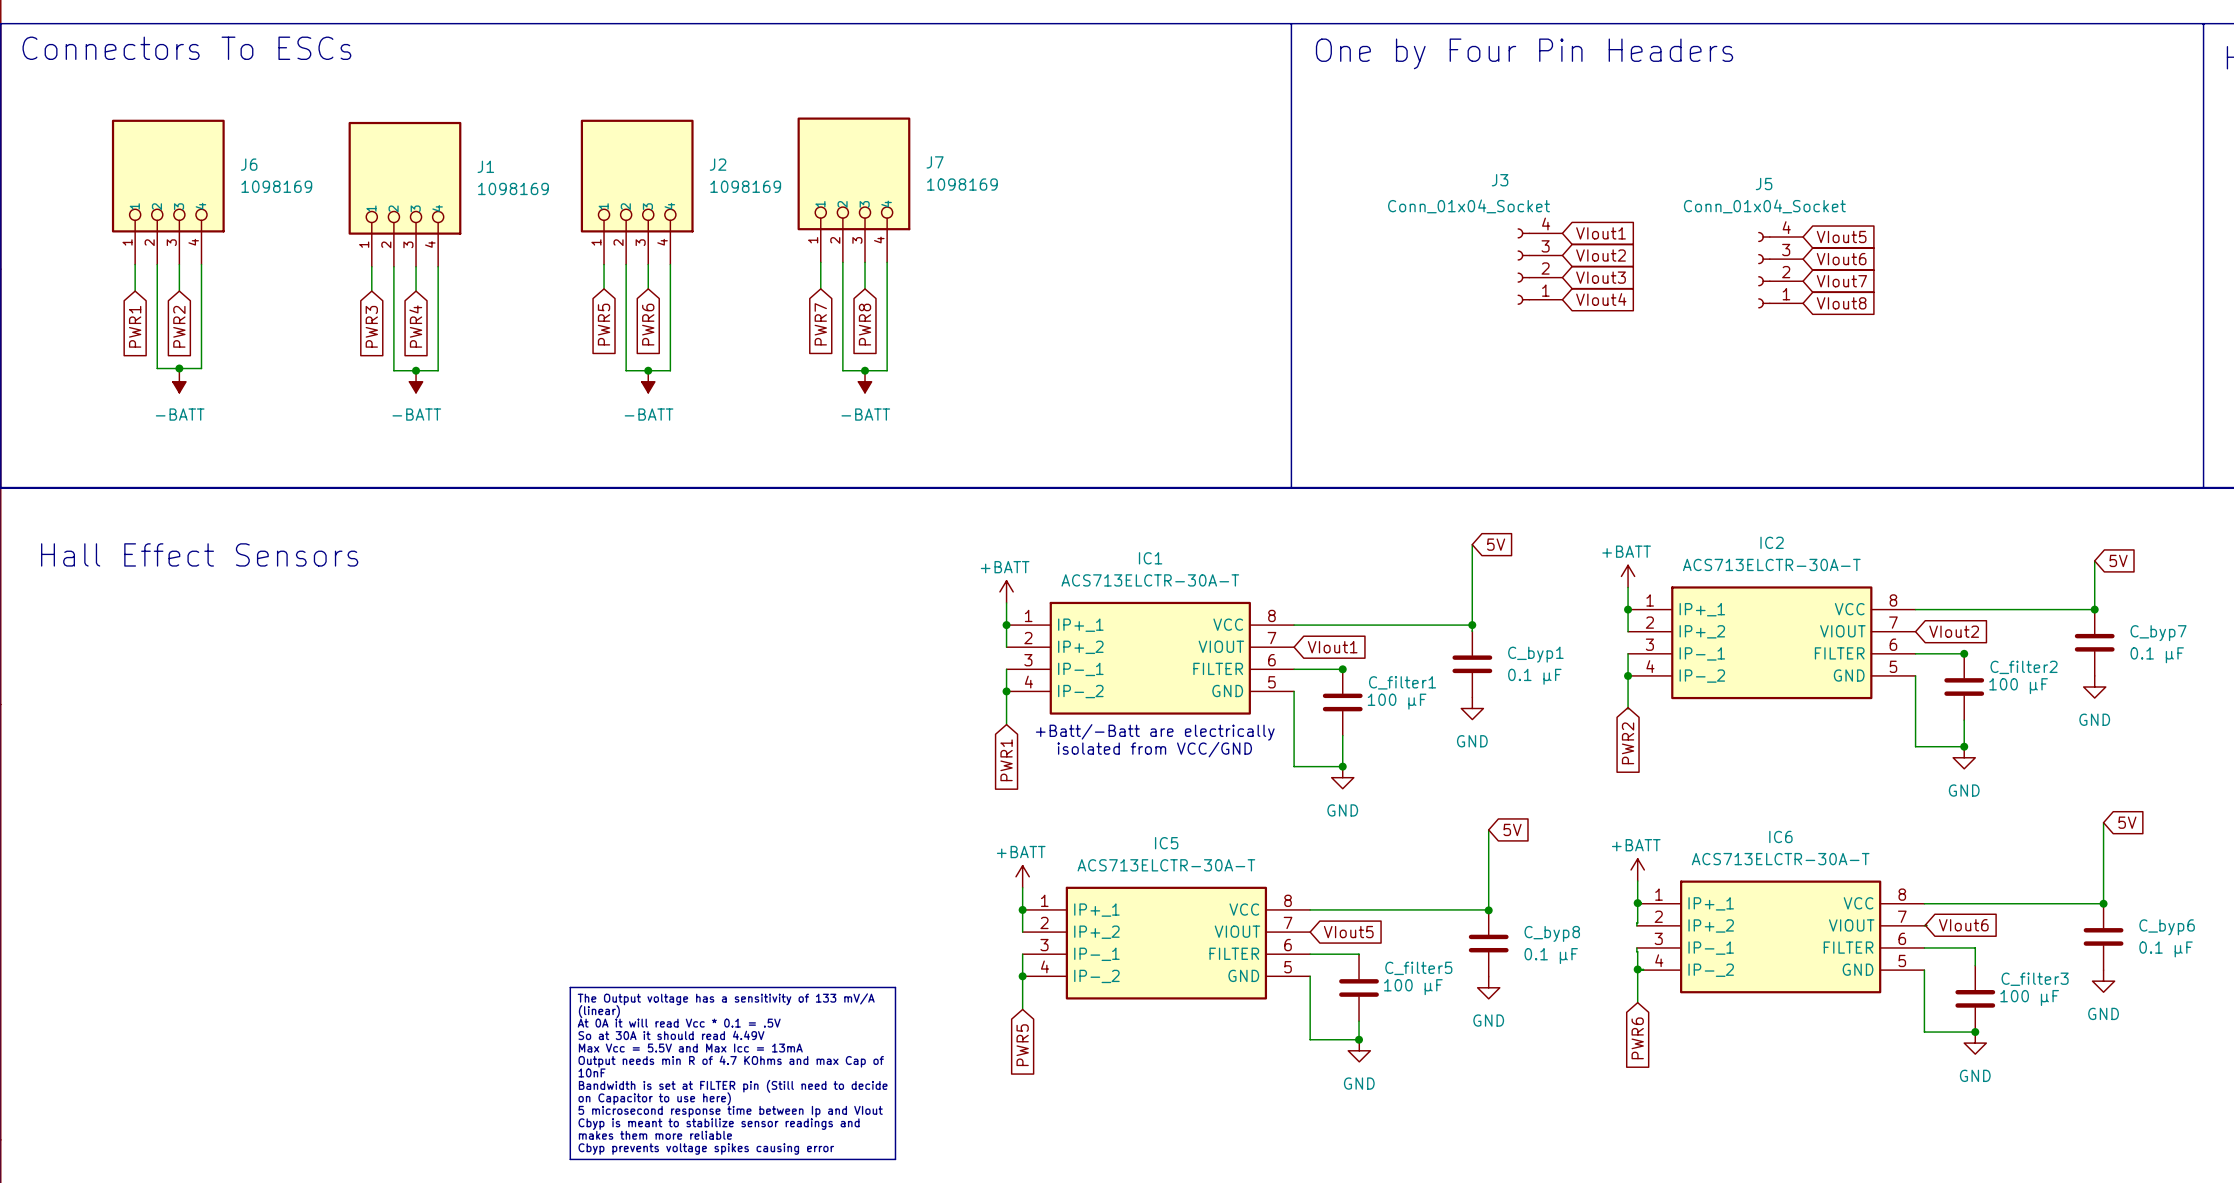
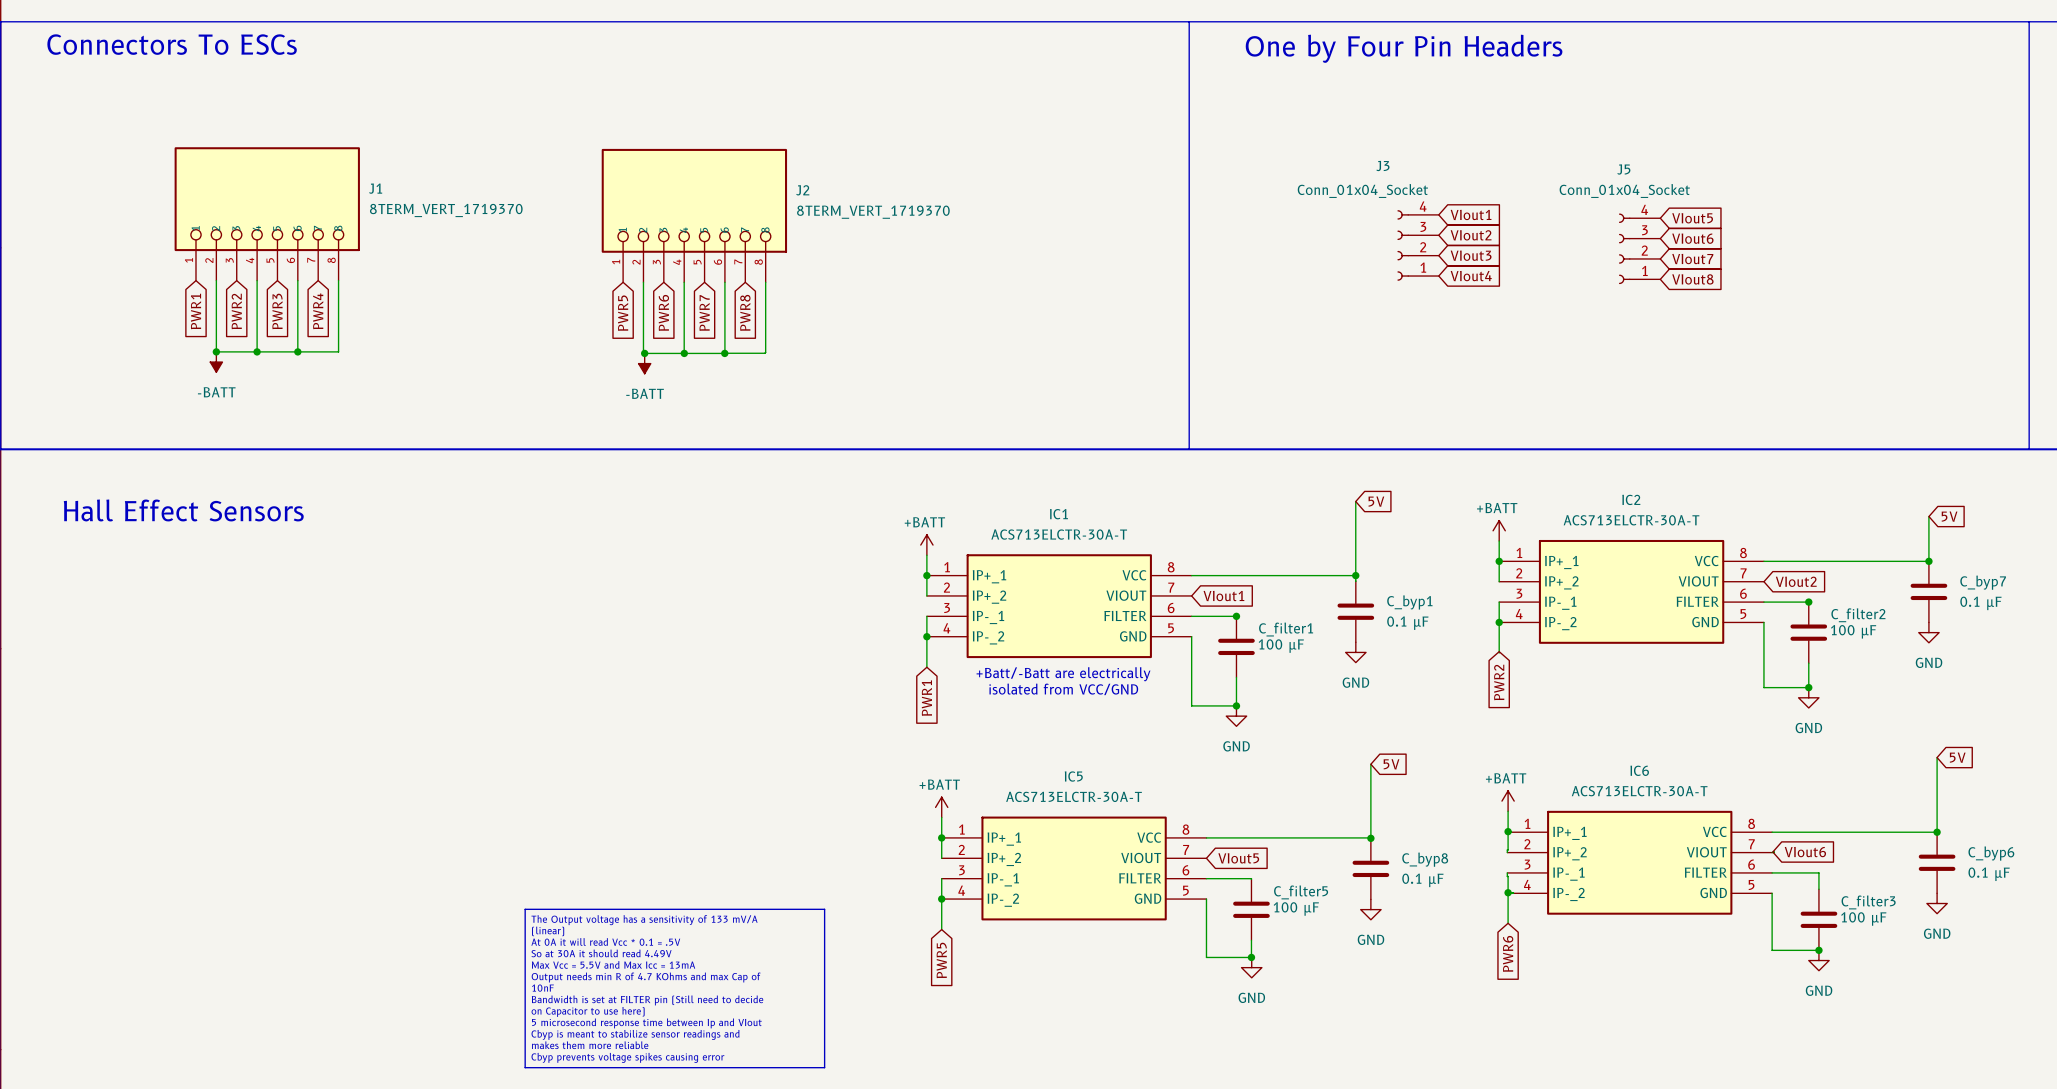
J2 symbol: [580, 119, 694, 265] -> [601, 148, 788, 283]
J1 symbol: [348, 121, 462, 267] -> [174, 147, 360, 281]
J2 name position: J2 (718, 164) -> J2 (802, 190)
J1 name position: J1 (485, 166) -> J1 (375, 188)
J2 value: 1098169 (745, 186) -> 8TERM_VERT_1719370 (873, 212)
J1 value: 1098169 (513, 188) -> 8TERM_VERT_1719370 (446, 210)
J7: 1098169 (853, 189) -> none
J6: 1098169 (168, 192) -> none
wire: (842, 262) (842, 370) (887, 370) (887, 262) -> none
wire: (865, 262) (865, 288) -> none
wire: (135, 264) (135, 291) -> none
wire: (157, 264) (157, 368) (201, 368) (201, 264) -> none
wire: (179, 264) (179, 291) -> none
wire: (604, 264) (604, 288) -> none
wire: (626, 264) (626, 370) (670, 370) (670, 264) -> none
wire: (648, 264) (648, 288) -> none
wire: (371, 266) (371, 291) -> none
wire: (393, 266) (393, 370) (438, 370) (438, 266) -> none
wire: (416, 266) (416, 291) -> none
wire: none -> (216, 280) (216, 351) (338, 351) (338, 280)
wire: none -> (257, 280) (257, 351)
wire: none -> (297, 280) (297, 351)
wire: none -> (643, 282) (644, 353) (724, 353) (724, 282)
wire: none -> (684, 282) (684, 353)
wire: none -> (765, 282) (765, 352) (724, 353)
global label position: PWR5 (604, 324) -> PWR5 (623, 313)
global label position: PWR6 (648, 324) -> PWR6 (663, 312)
global label position: PWR7 (820, 324) -> PWR7 (704, 313)
global label position: PWR8 (865, 324) -> PWR8 (745, 312)
global label position: PWR1 (135, 326) -> PWR1 (195, 311)
global label position: PWR2 (179, 326) -> PWR2 (236, 311)
global label position: PWR3 (371, 326) -> PWR3 (277, 311)
global label position: PWR4 (415, 326) -> PWR4 (318, 311)
junction: (179, 368) -> none
junction: (416, 370) -> none
junction: (648, 370) -> none
junction: (865, 370) -> none
power symbol position: -BATT (179, 381) -> -BATT (216, 362)
power symbol: -BATT (416, 381) -> none
power symbol position: -BATT (648, 381) -> -BATT (644, 363)
power symbol: -BATT (865, 381) -> none
junction: none -> (216, 351)
junction: none -> (257, 351)
junction: none -> (297, 351)
junction: none -> (644, 353)
junction: none -> (684, 353)
junction: none -> (724, 353)

